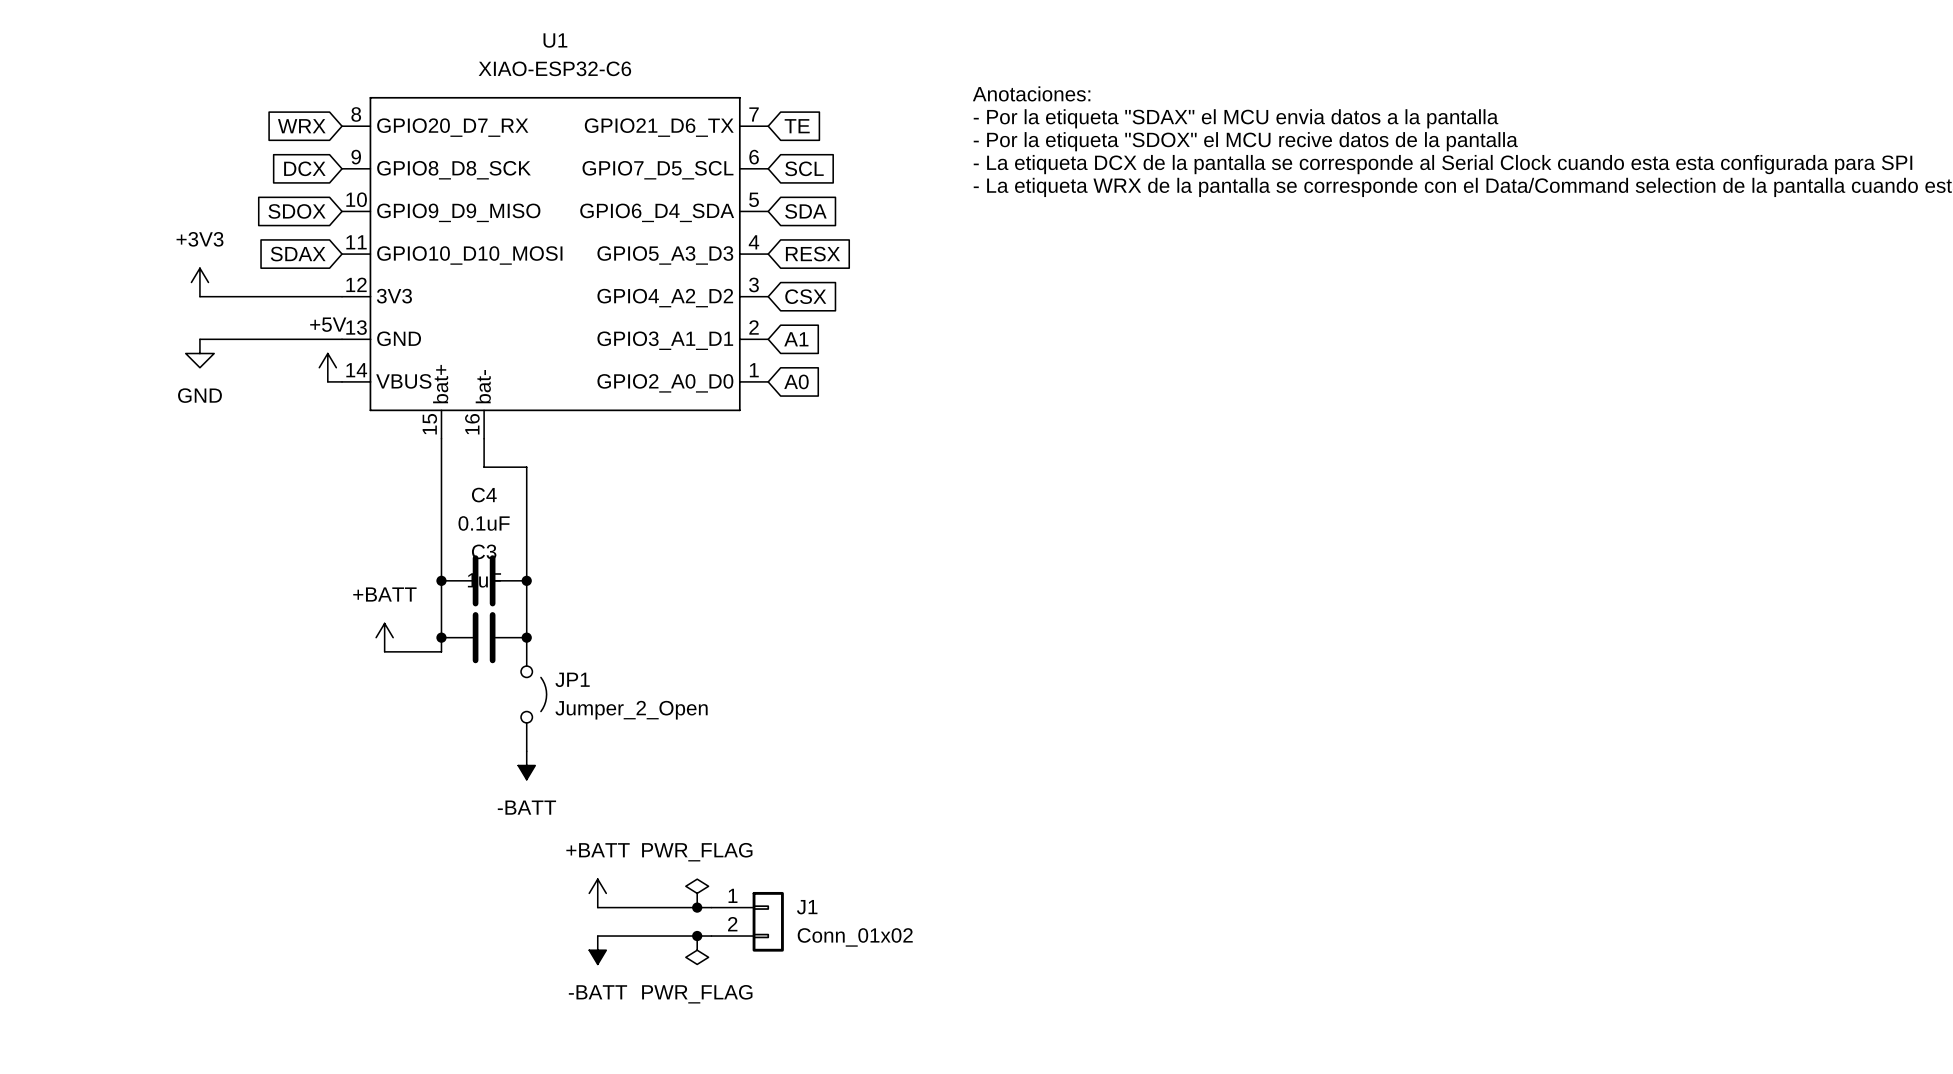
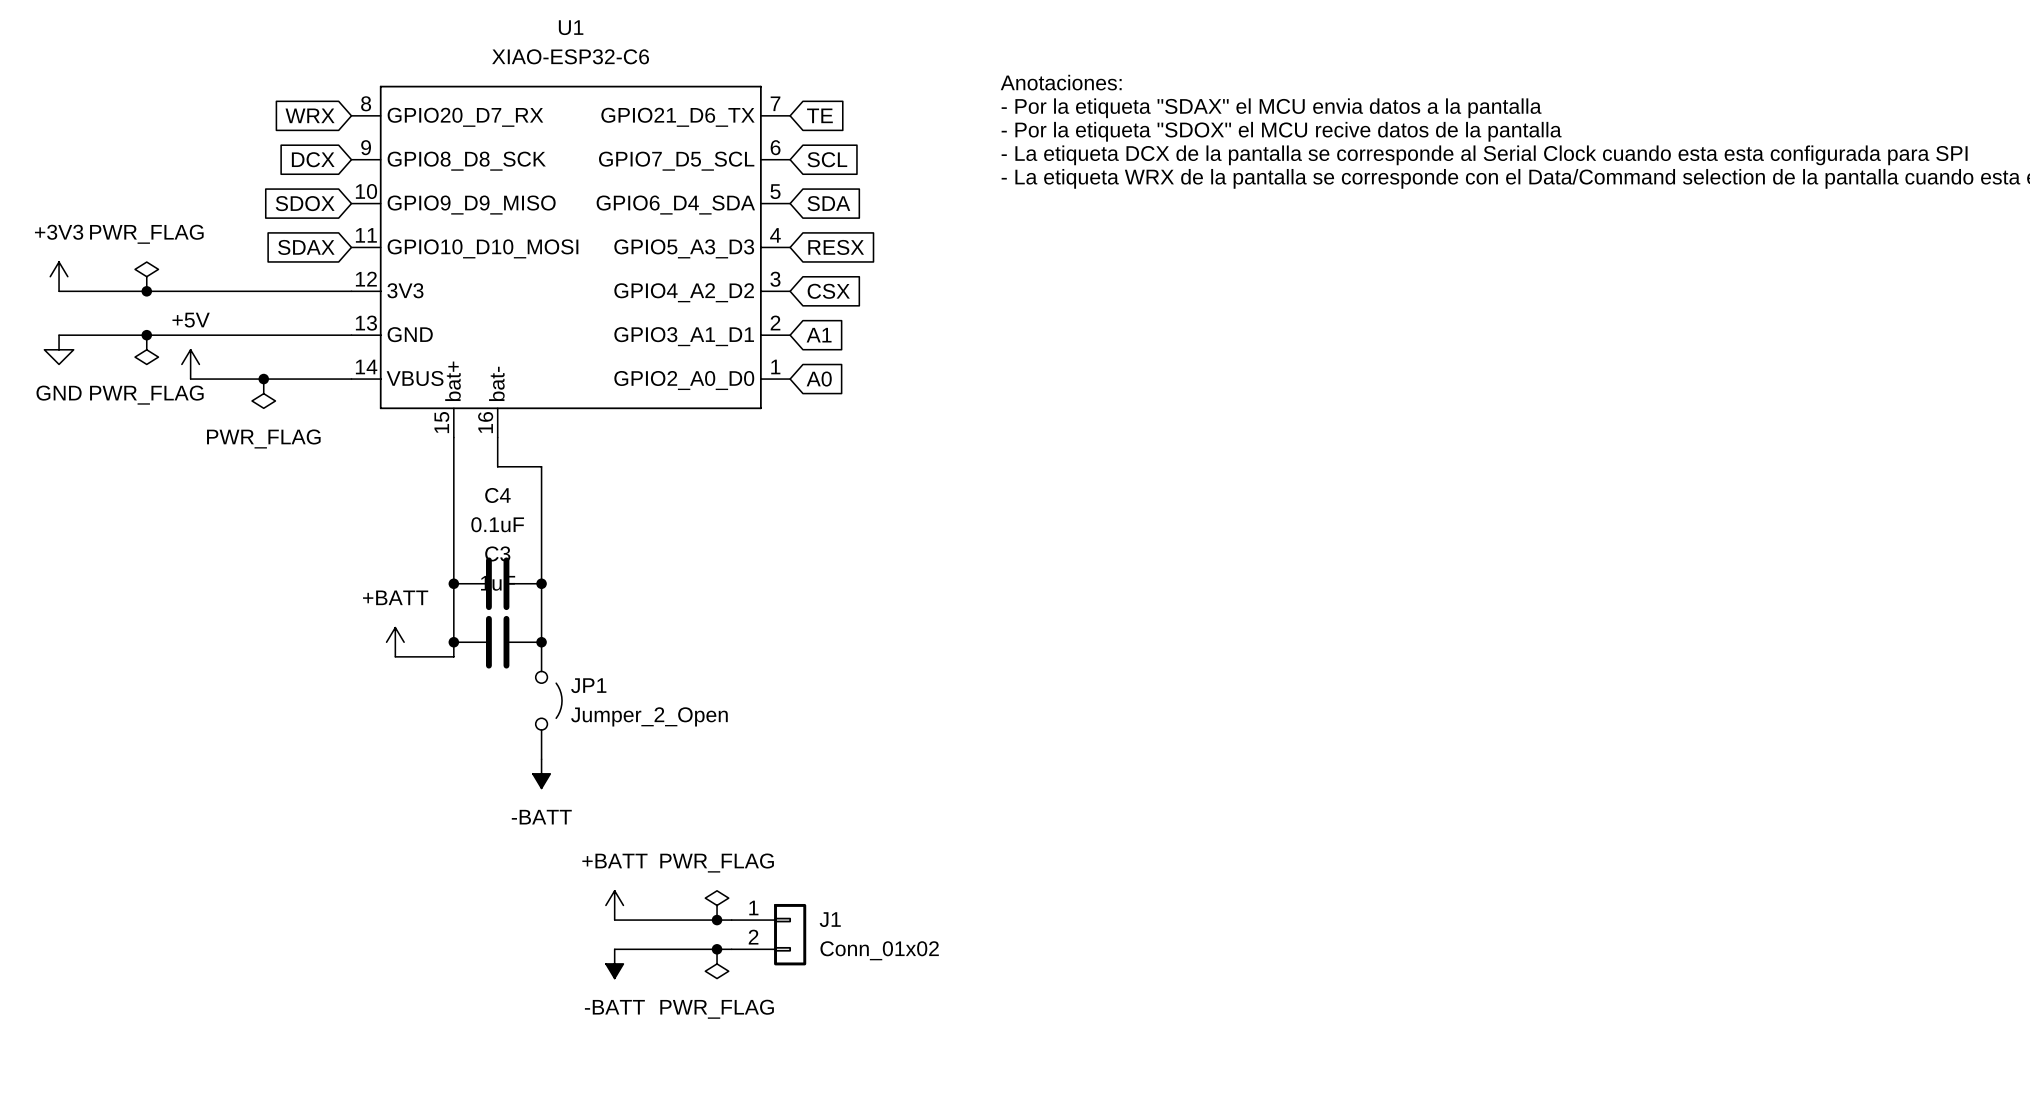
power symbol: none -> PWR_FLAG (146, 276)
power symbol position: +3V3 (199, 282) -> +3V3 (59, 276)
wire: none -> (59, 291) (205, 291)
junction: none -> (146, 291)
wire: none -> (59, 335) (205, 335)
junction: none -> (146, 335)
power symbol: none -> PWR_FLAG (146, 349)
power symbol position: GND (199, 353) -> GND (59, 349)
power symbol position: +5V (327, 367) -> +5V (190, 364)
wire: none -> (190, 379) (336, 379)
junction: none -> (263, 379)
power symbol: none -> PWR_FLAG (263, 393)

